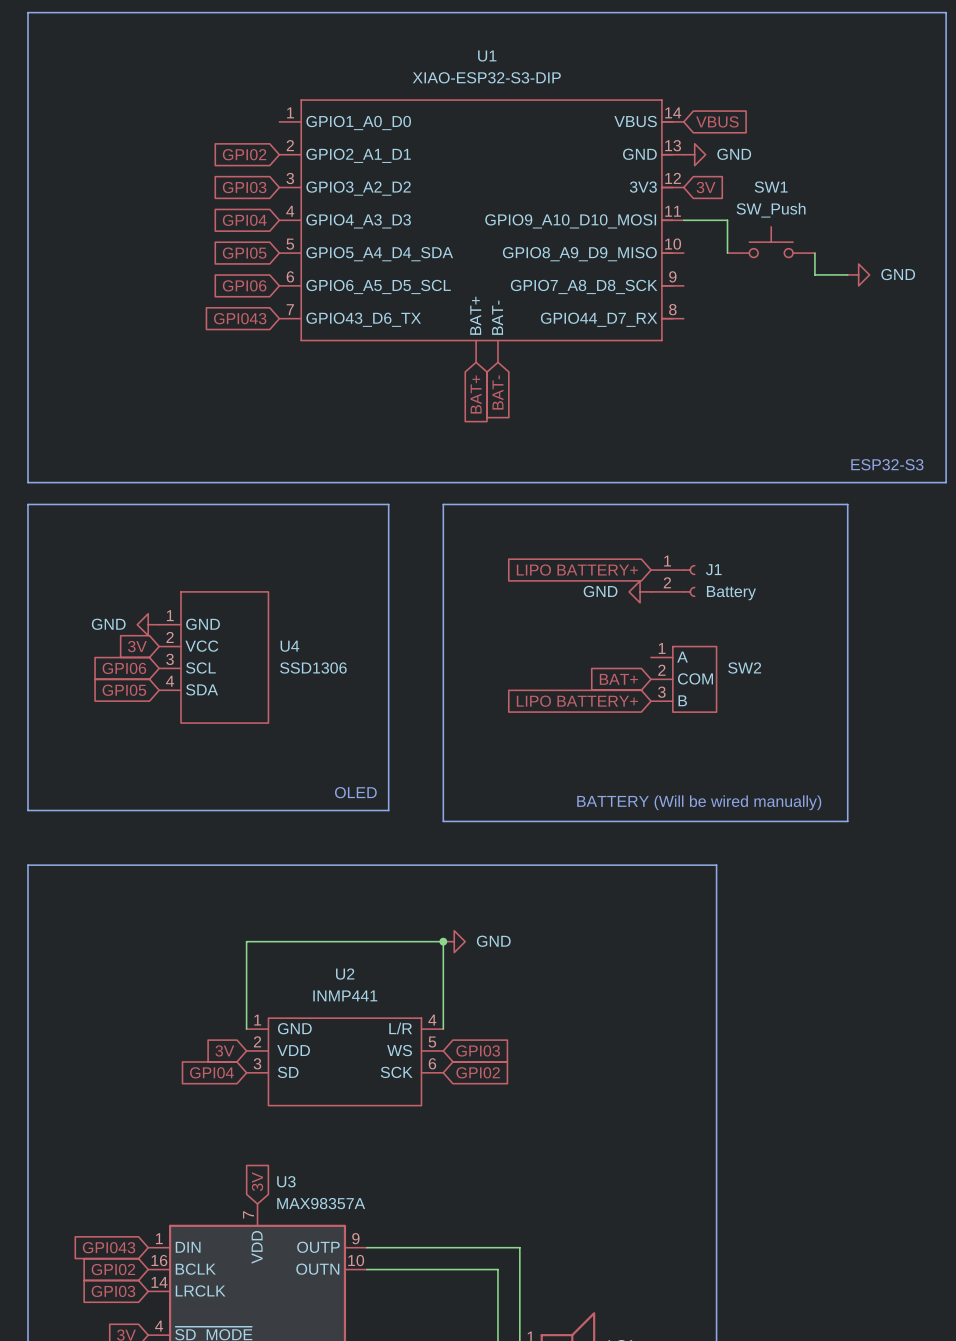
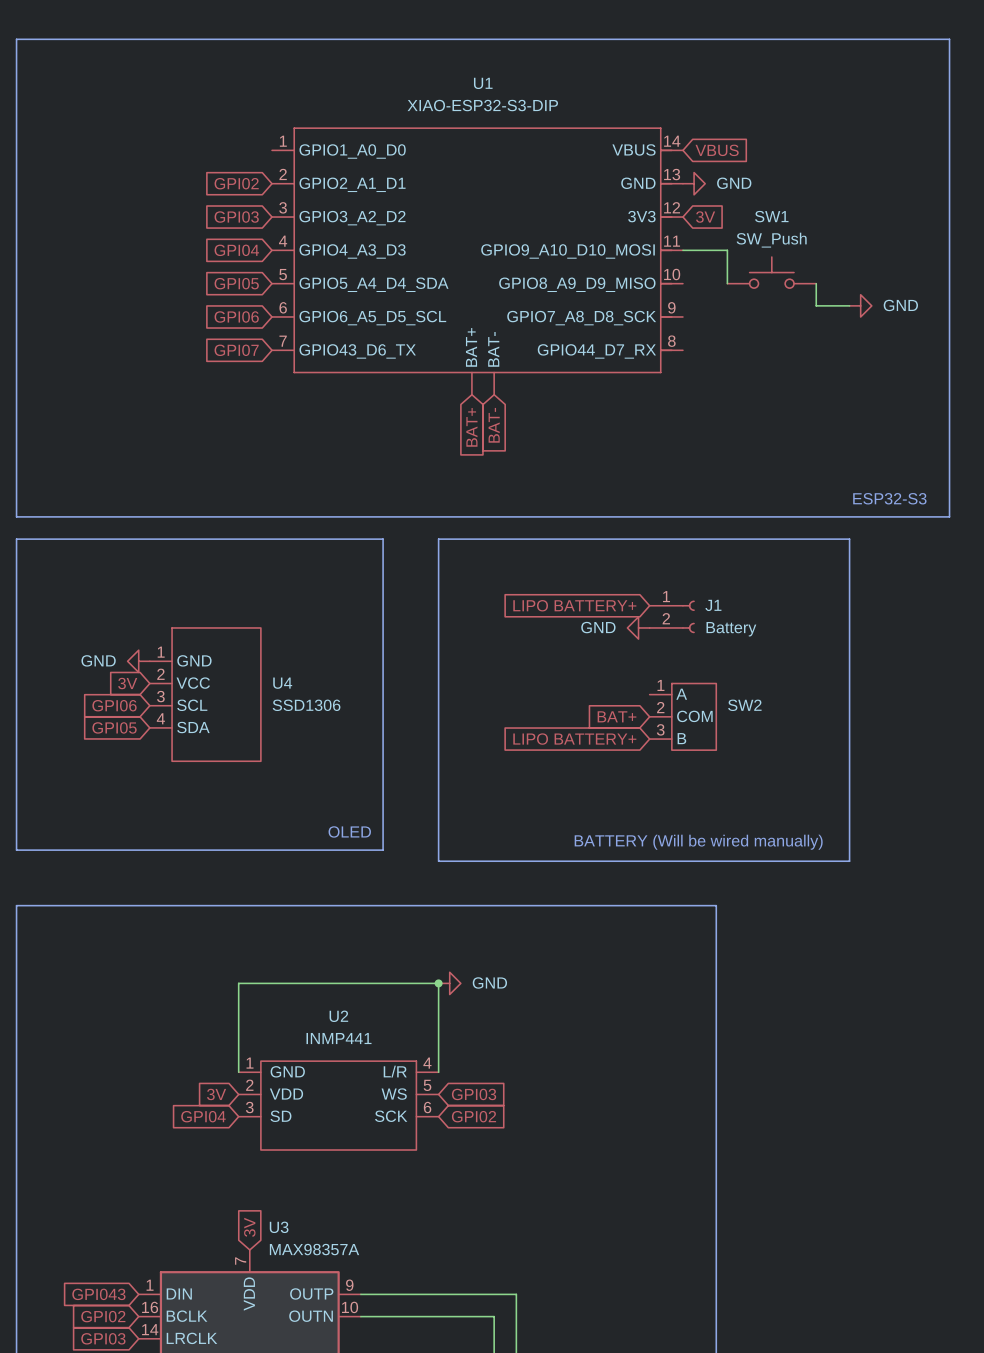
global label: GPI043 (240, 318) -> GPI07 (236, 350)

